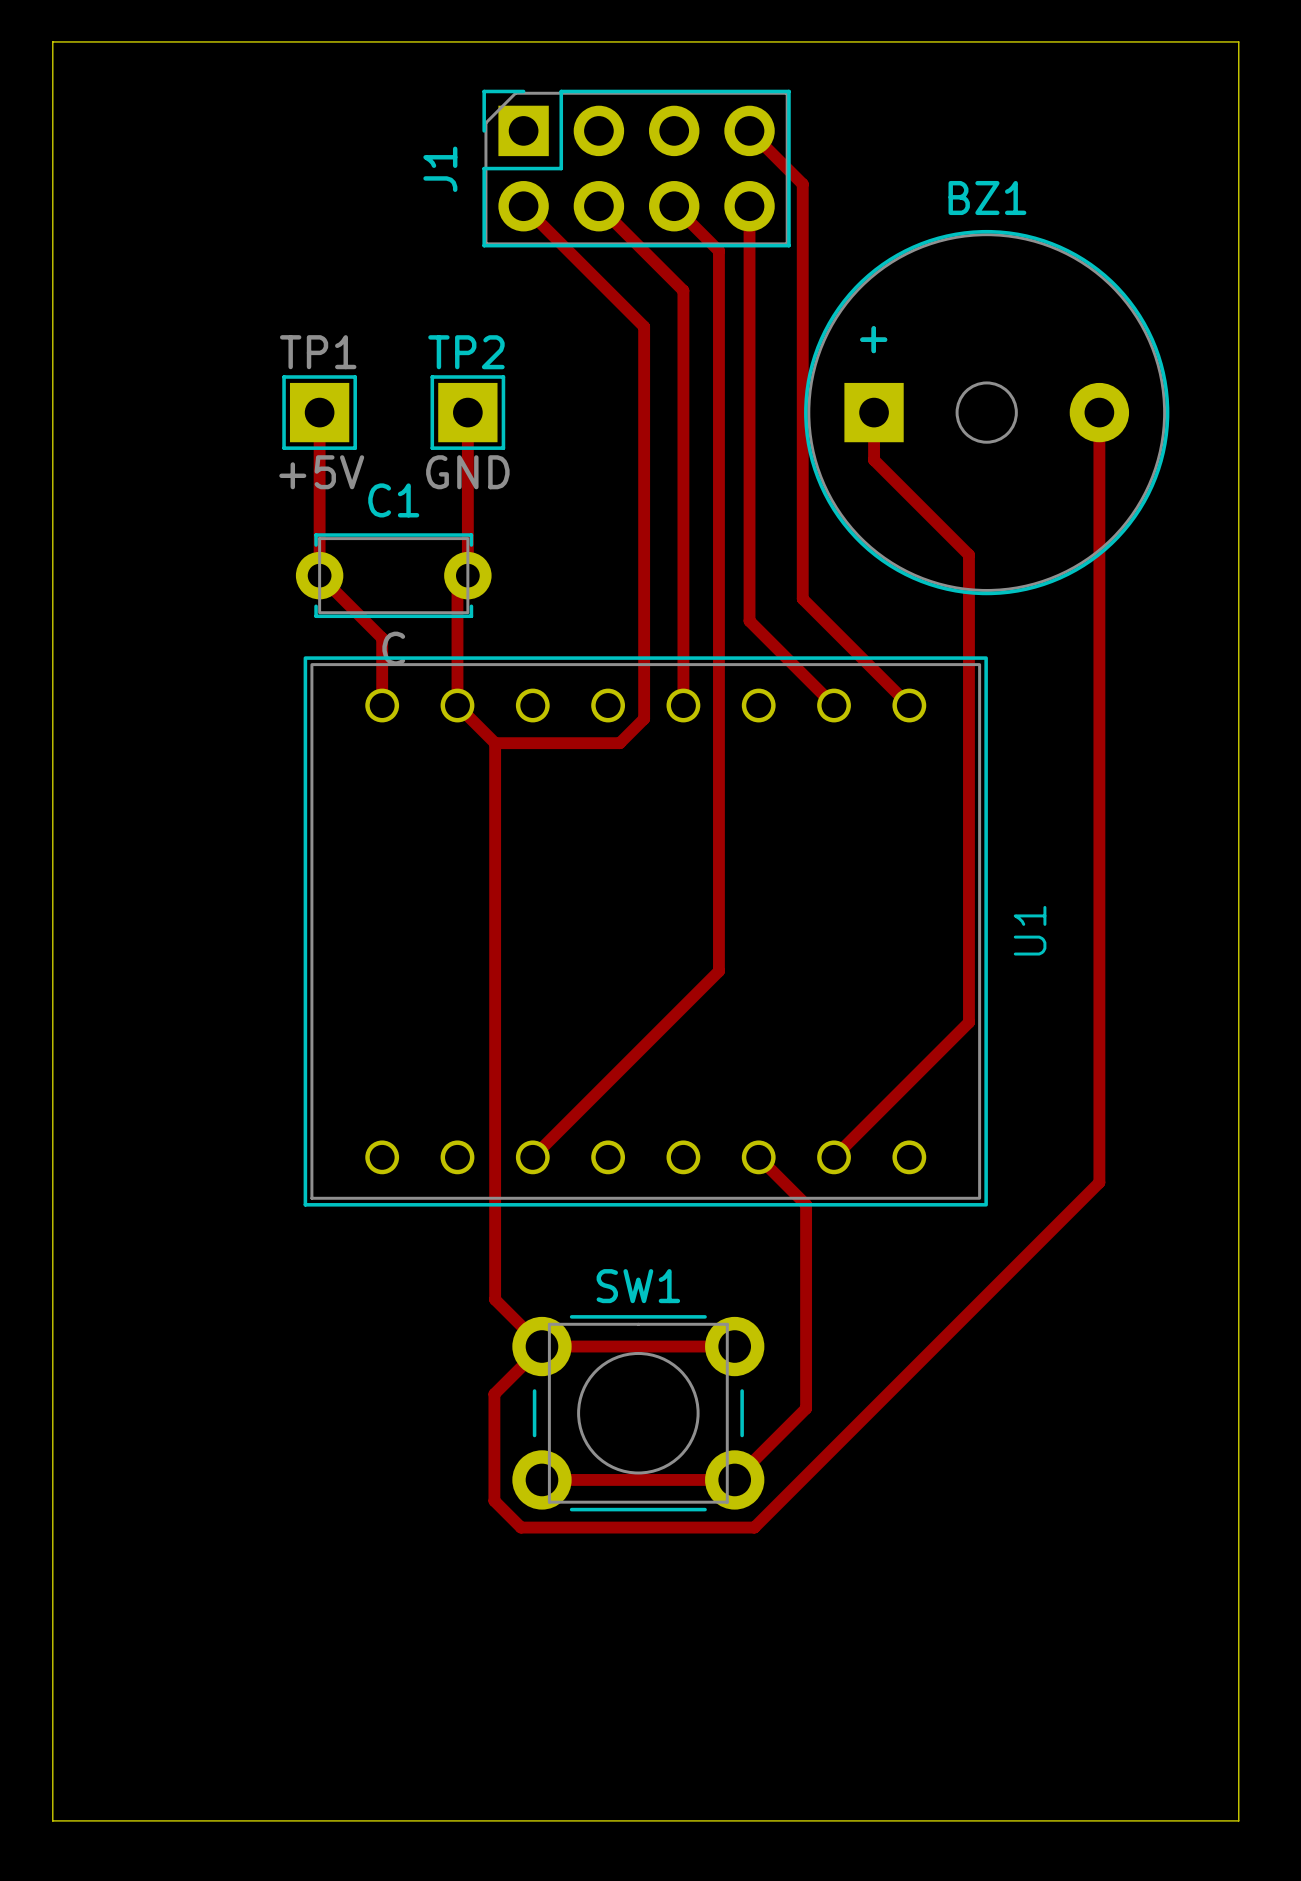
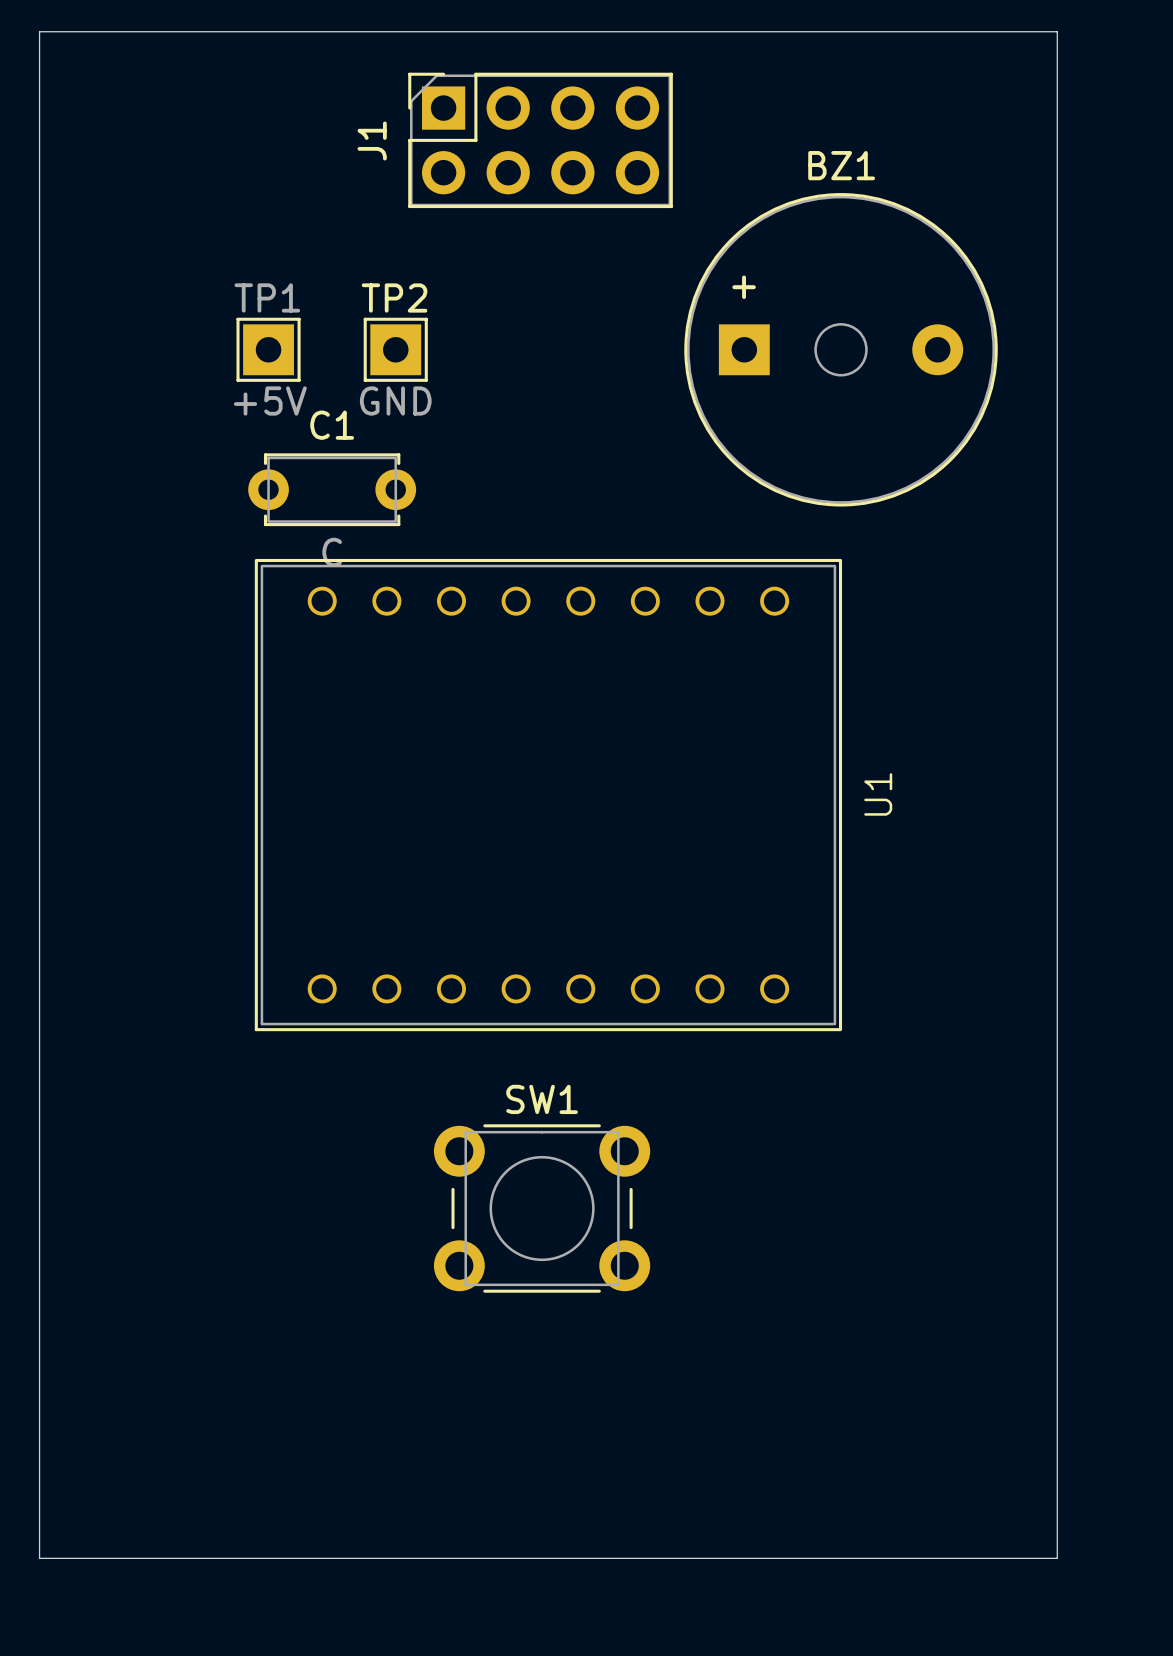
track: (749, 130) (802, 184) (802, 598) (909, 705) -> none
track: (523, 206) (644, 326) (644, 718) (619, 743) (495, 743) -> none
track: (598, 206) (683, 290) (683, 705) -> none
track: (674, 206) (718, 250) (718, 971) (532, 1157) -> none
track: (749, 206) (749, 621) (834, 705) -> none
track: (319, 412) (319, 575) (382, 638) (382, 705) -> none
track: (467, 412) (467, 575) (457, 586) (457, 705) (495, 743) -> none
track: (874, 412) (874, 460) (968, 554) (968, 1022) (834, 1157) -> none
track: (1099, 412) (1099, 1182) (754, 1527) (521, 1527) (494, 1500) (494, 1394) (541, 1346) -> none
track: (495, 743) (495, 1299) (541, 1346) -> none
track: (758, 1157) (806, 1204) (806, 1408) (734, 1479) (541, 1479) -> none
track: (541, 1346) (734, 1346) -> none

